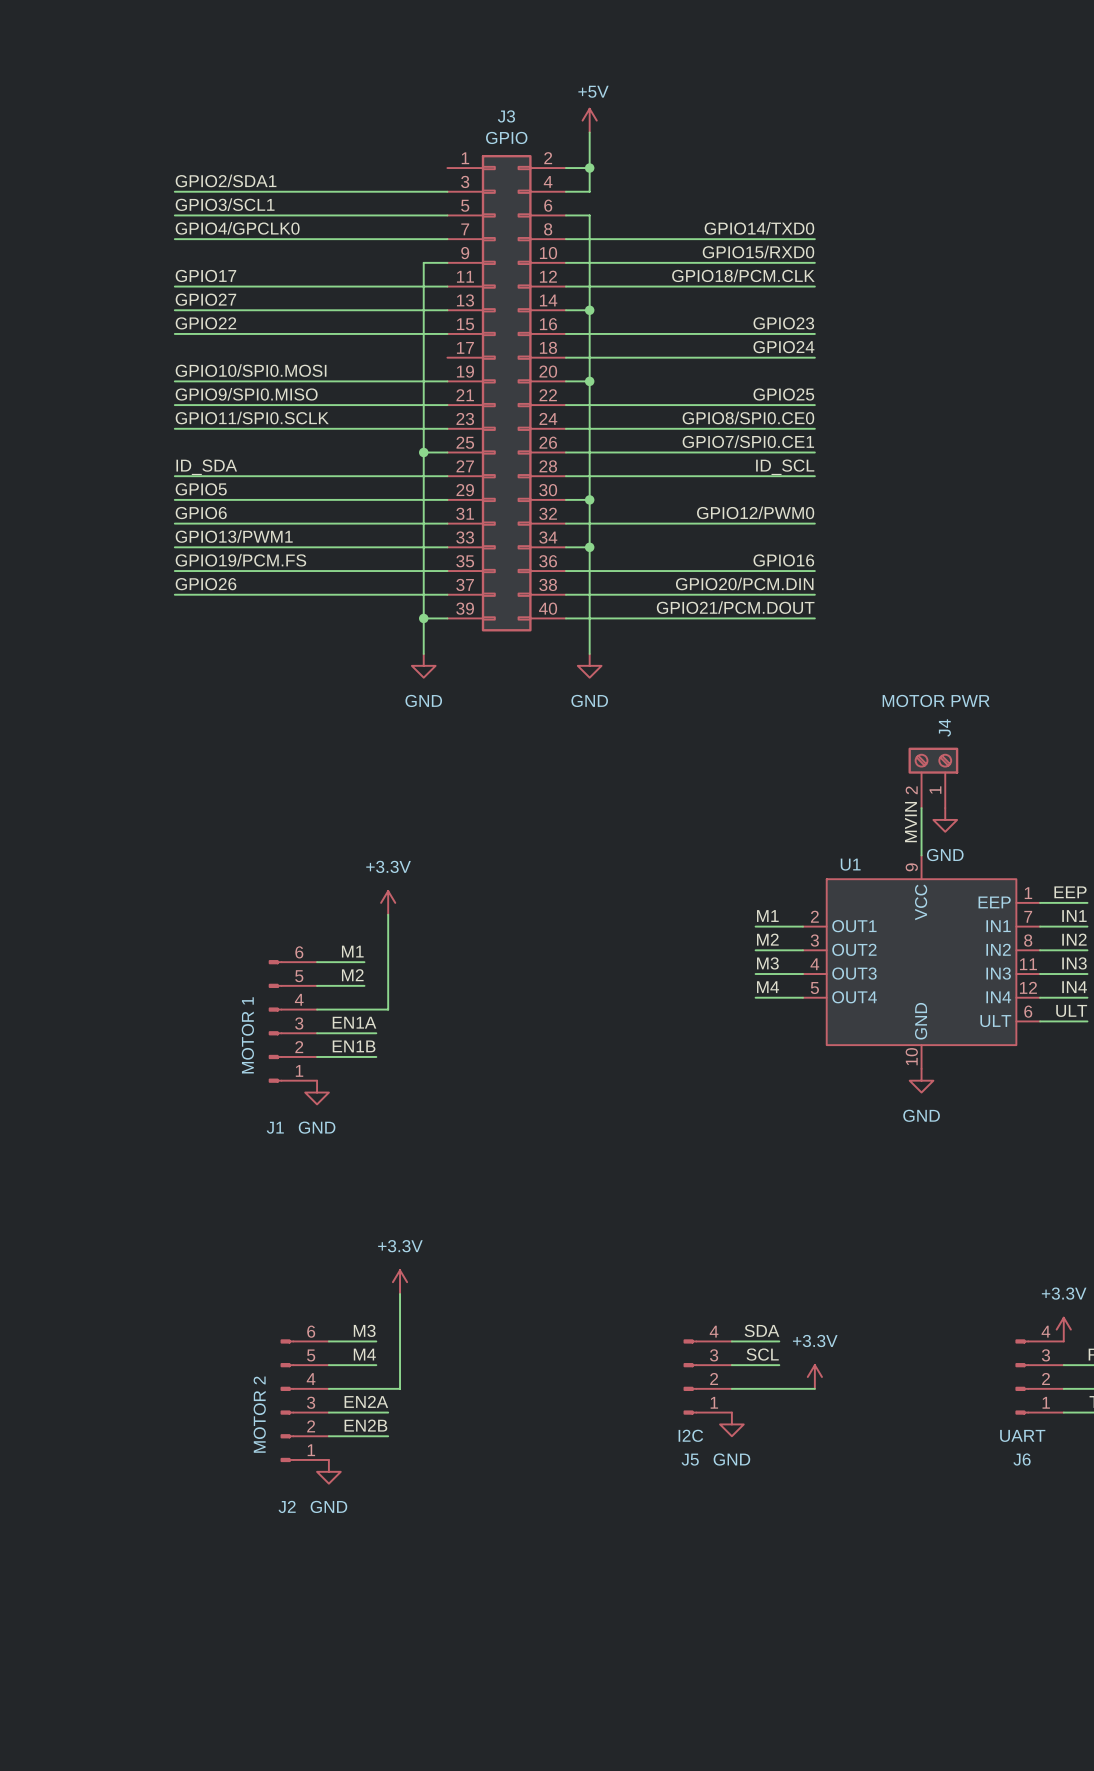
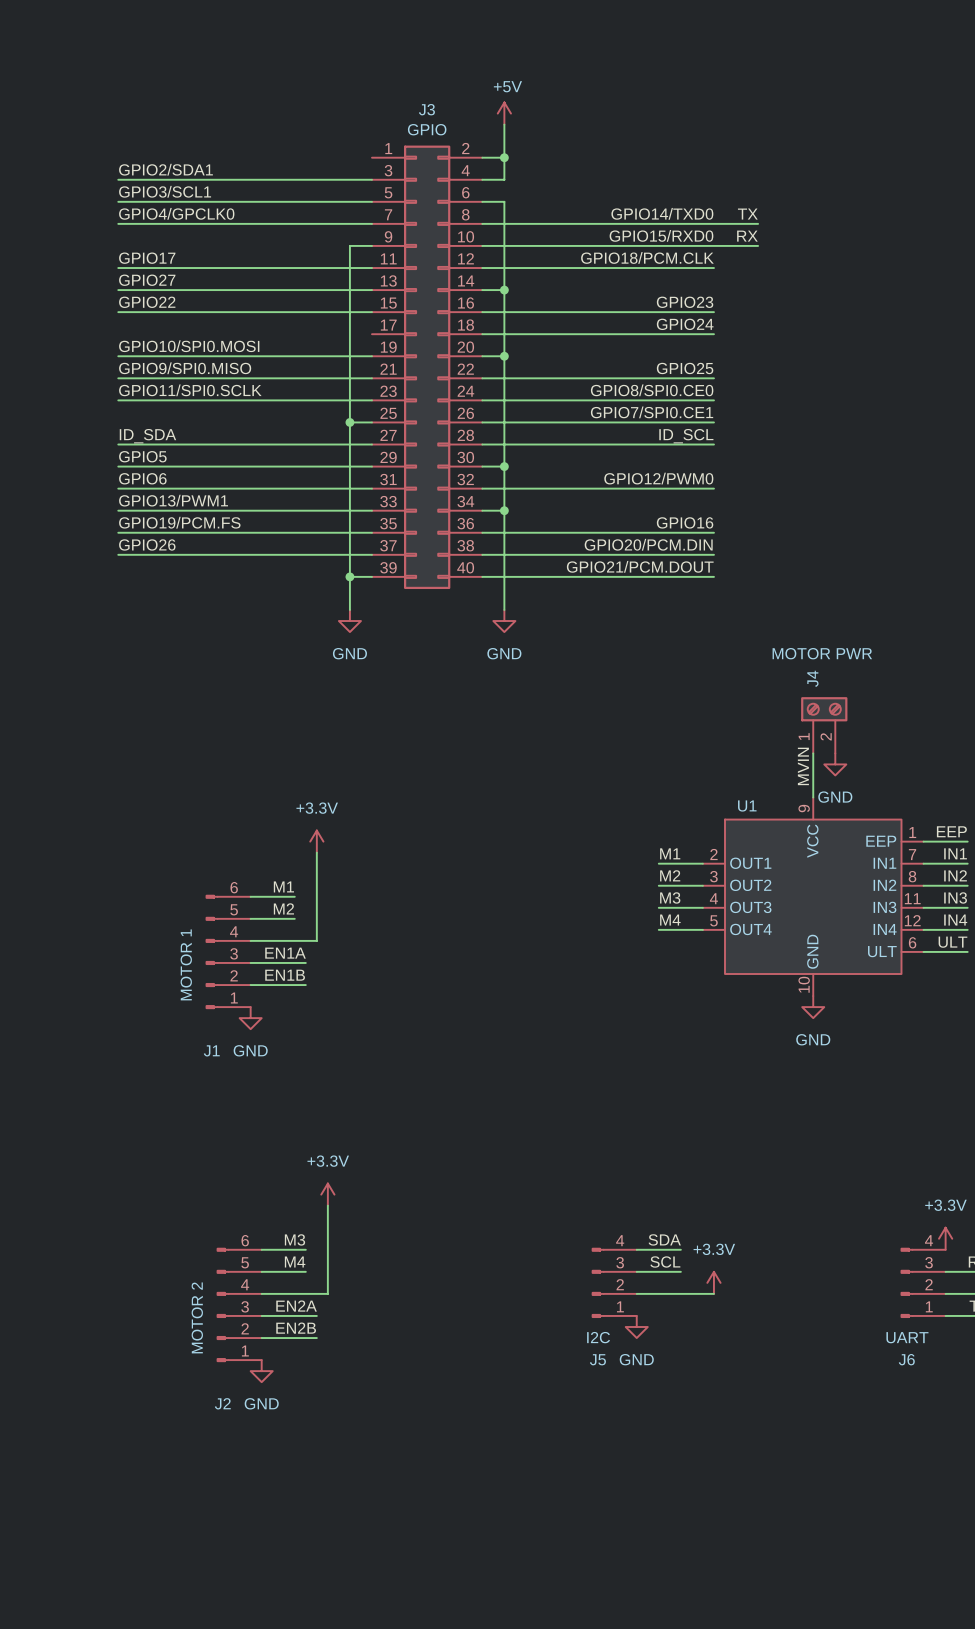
label: none -> TX (747, 214)
wire: none -> (713, 223) (758, 223)
label: none -> RX (747, 236)
wire: none -> (713, 245) (758, 245)
J4 flip: as is (933, 760) -> left-right (824, 709)

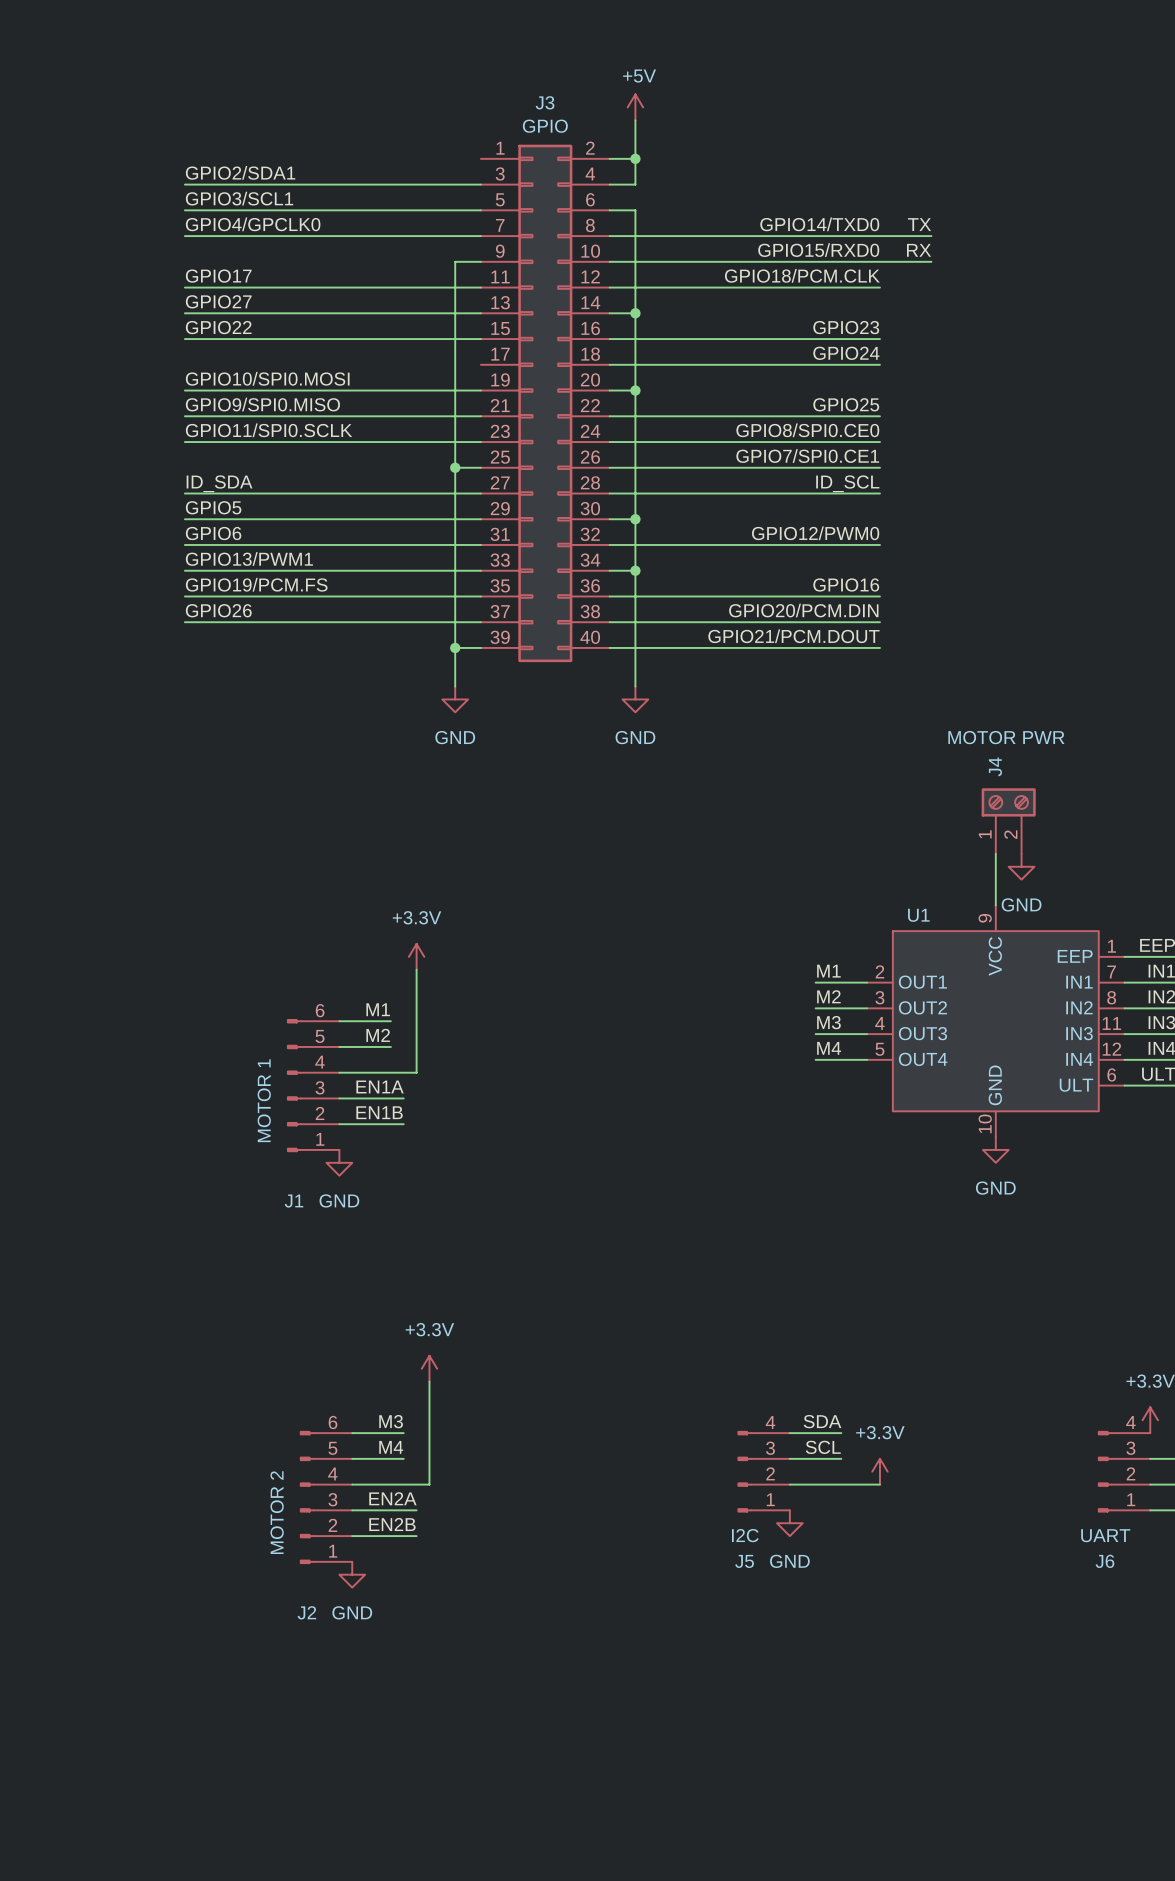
label: MVIN (803, 766) -> none

